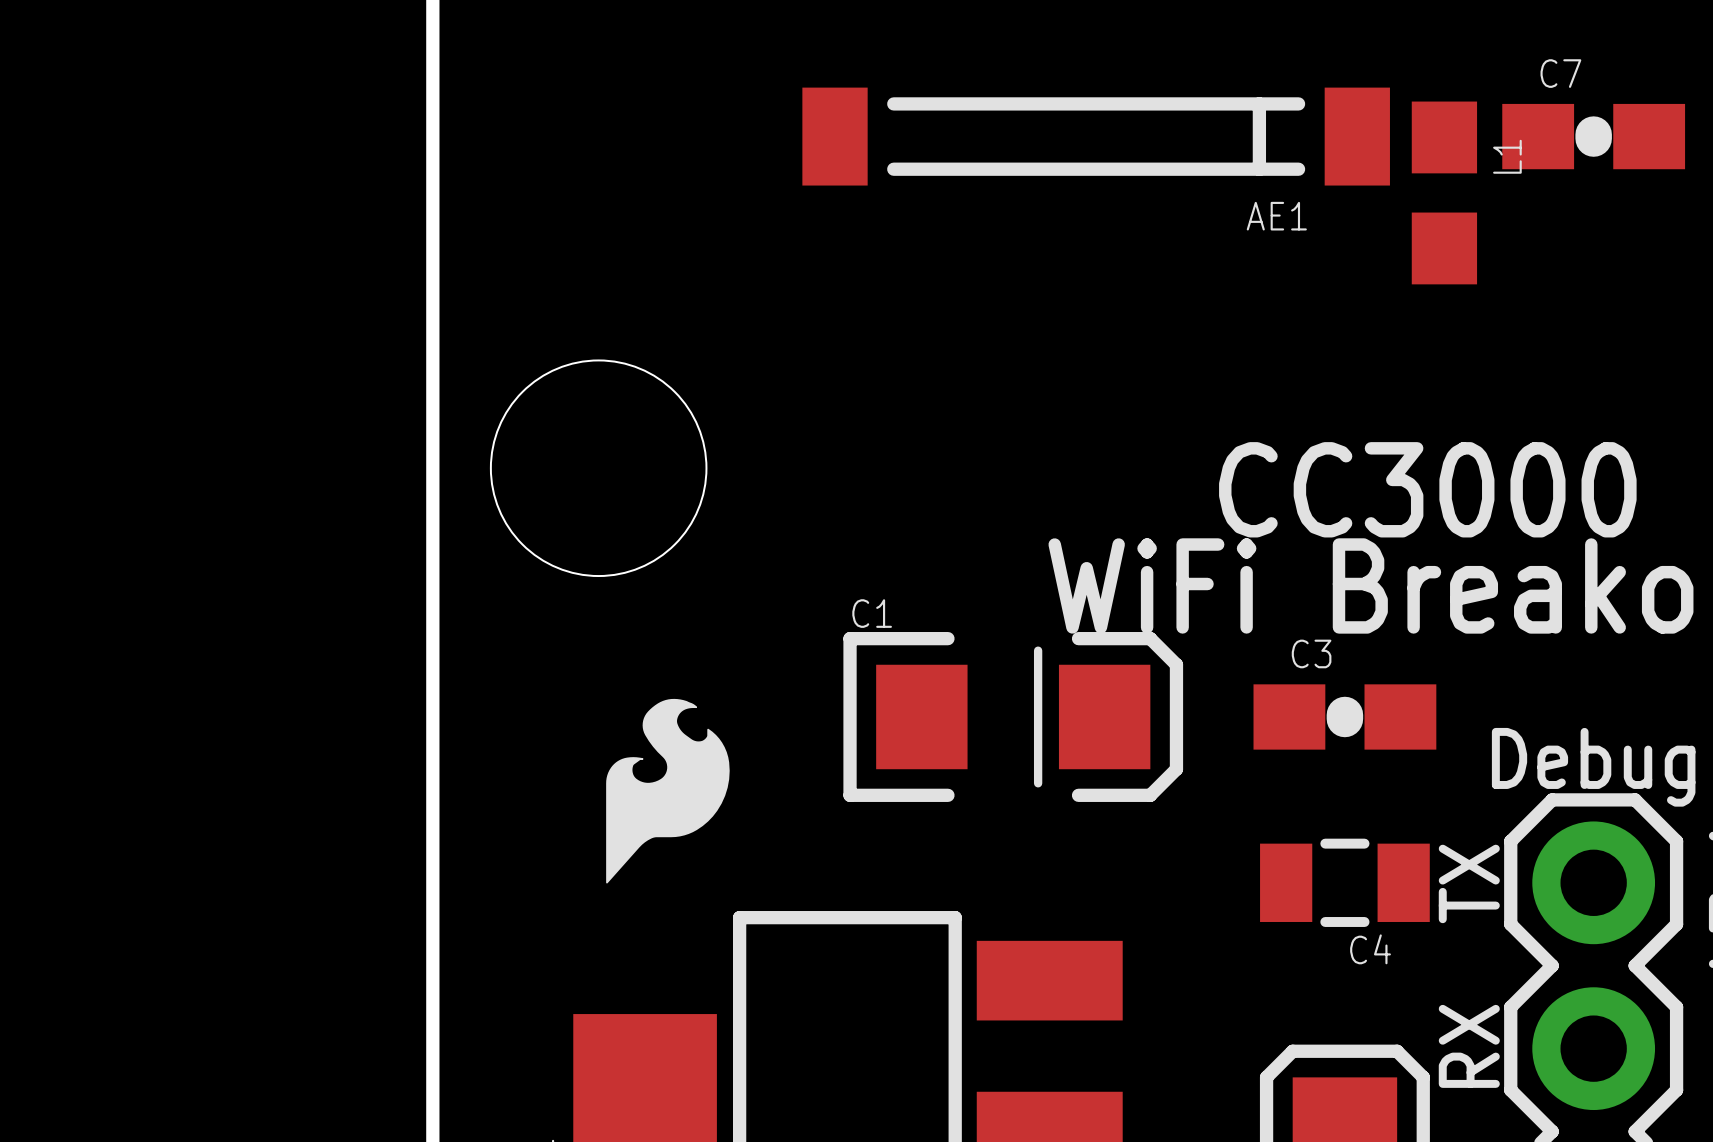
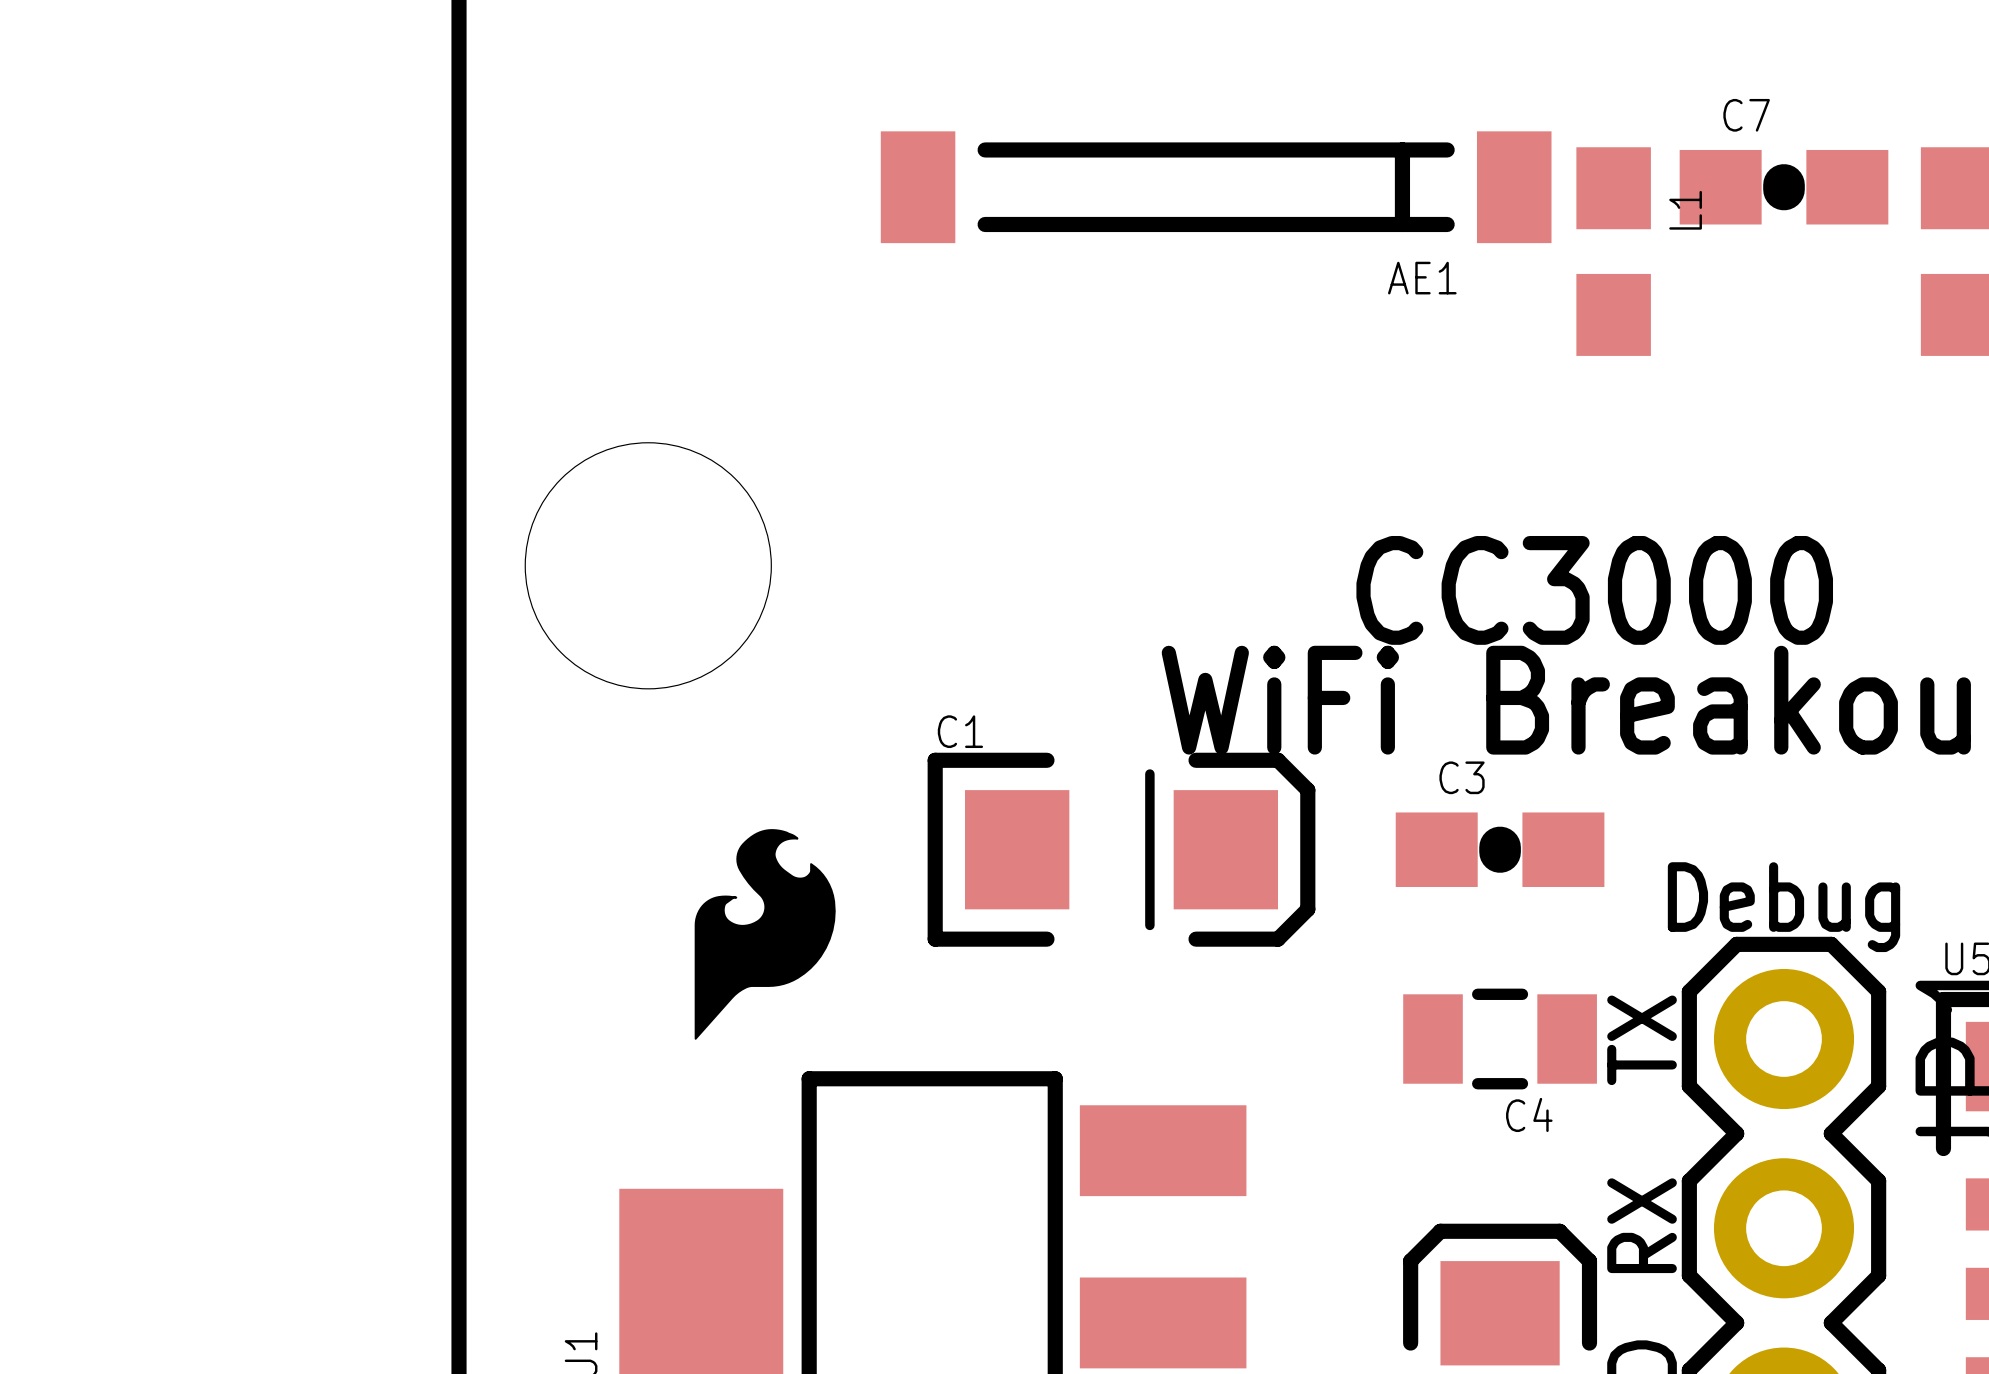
drawing position: (667, 791) -> (765, 934)

